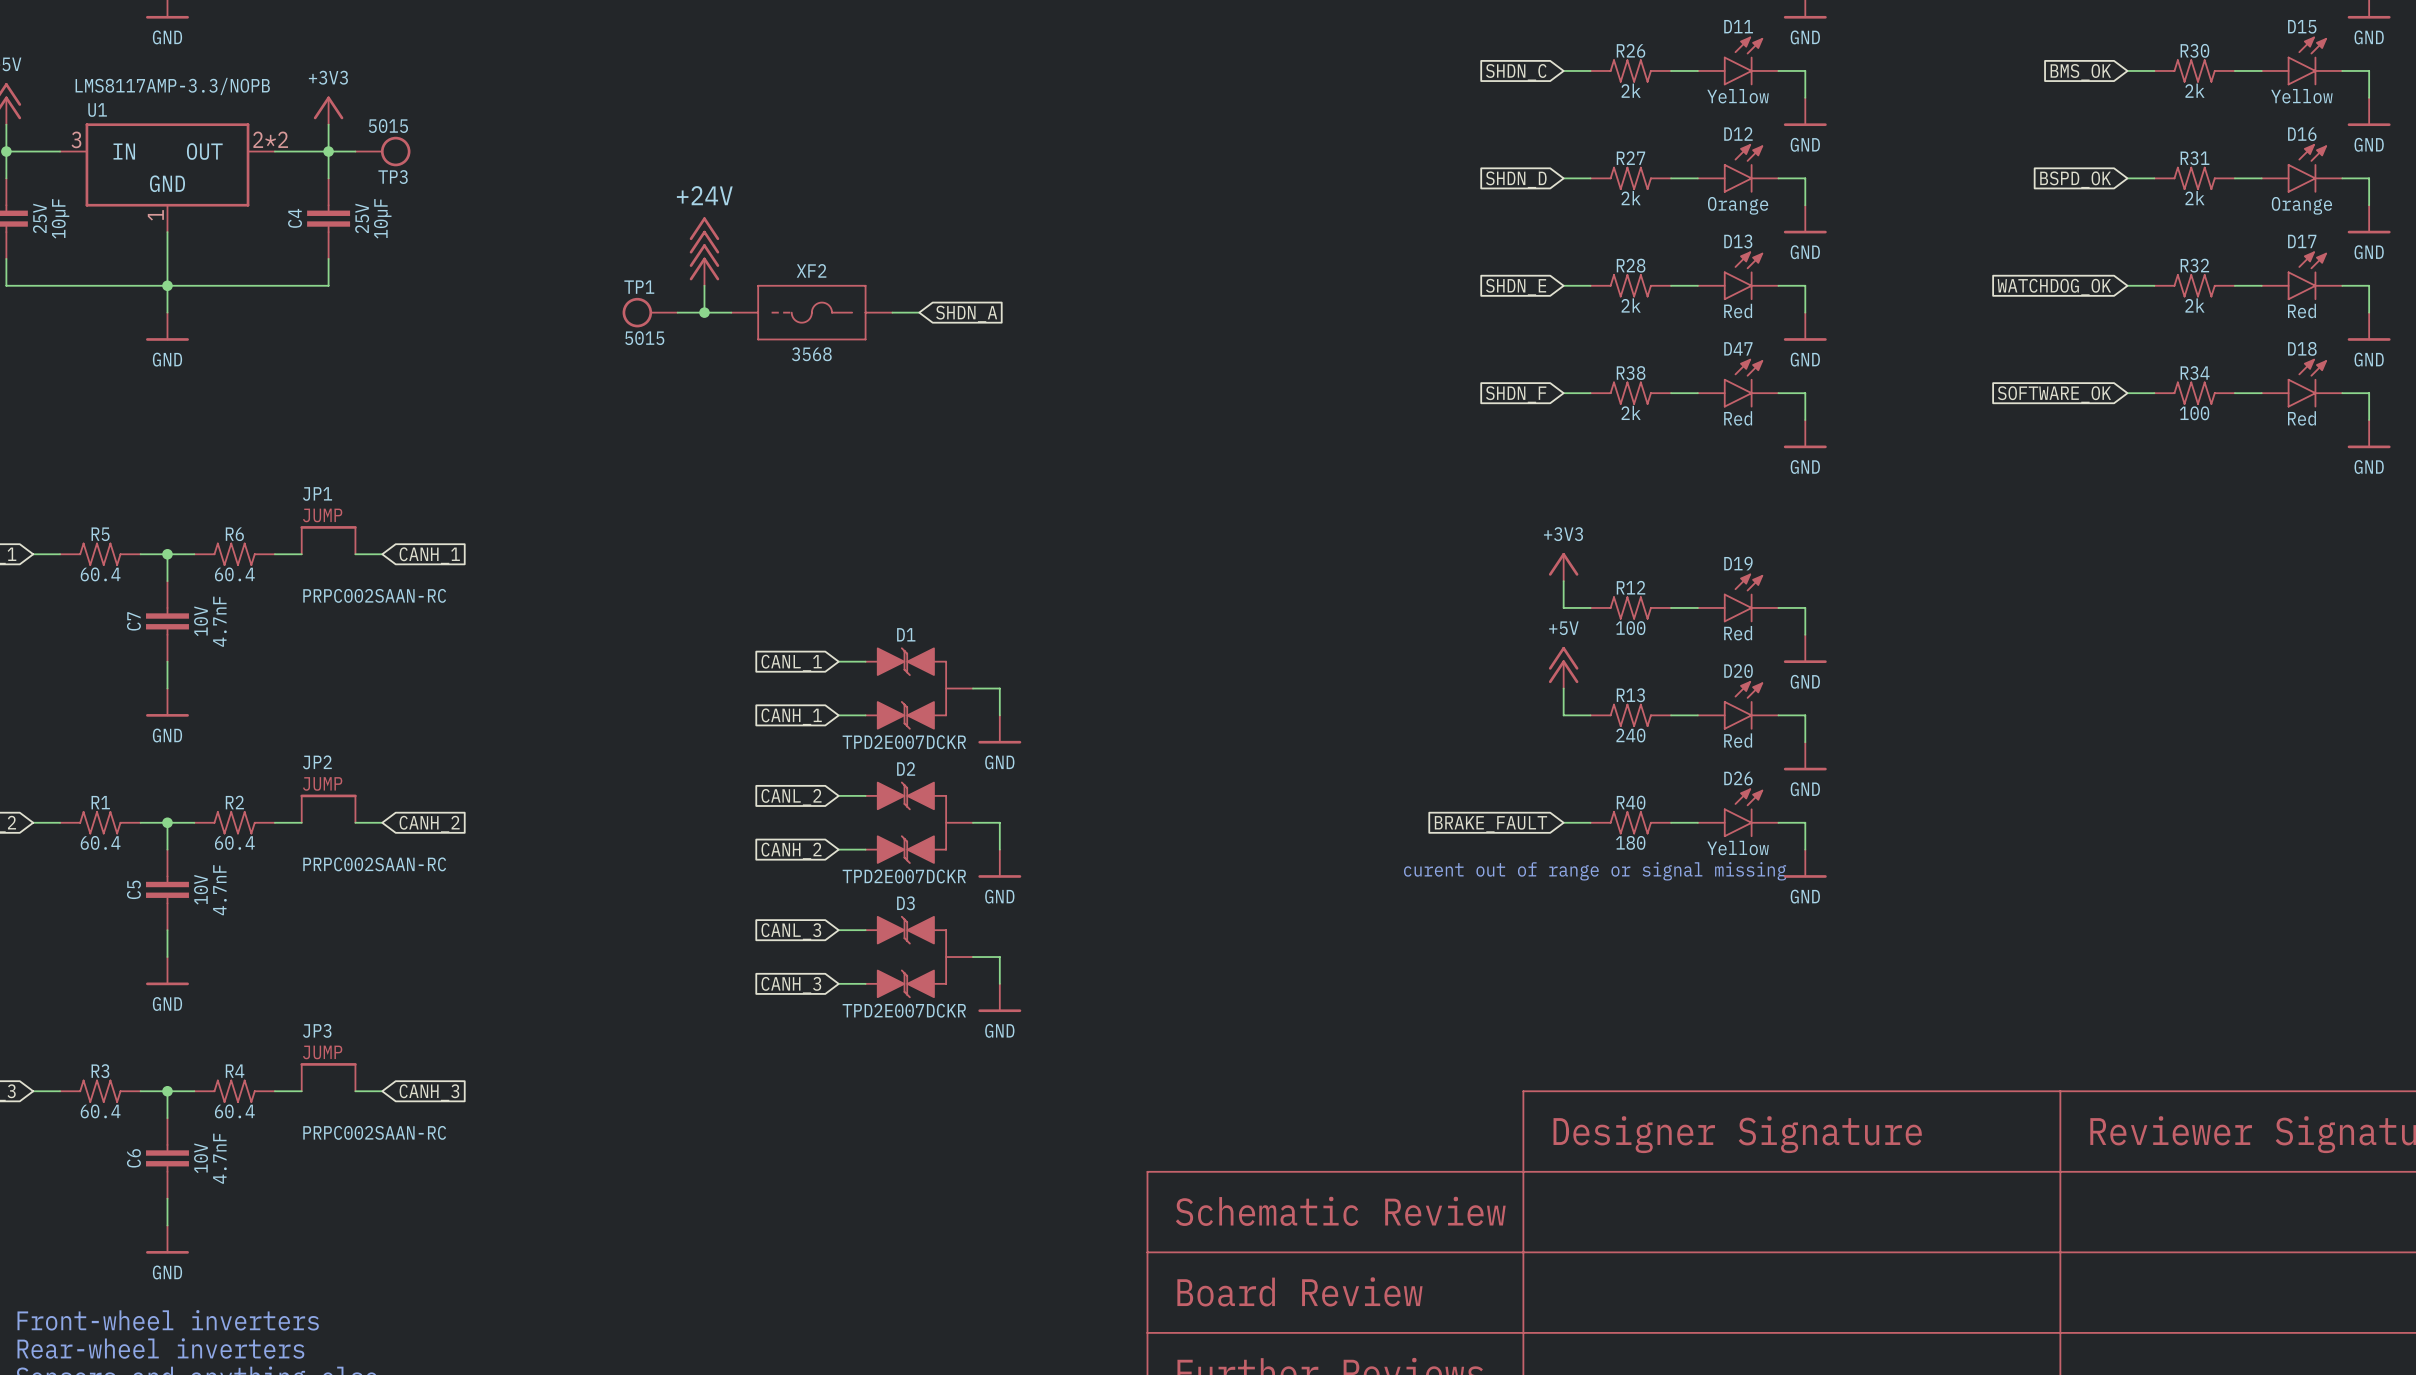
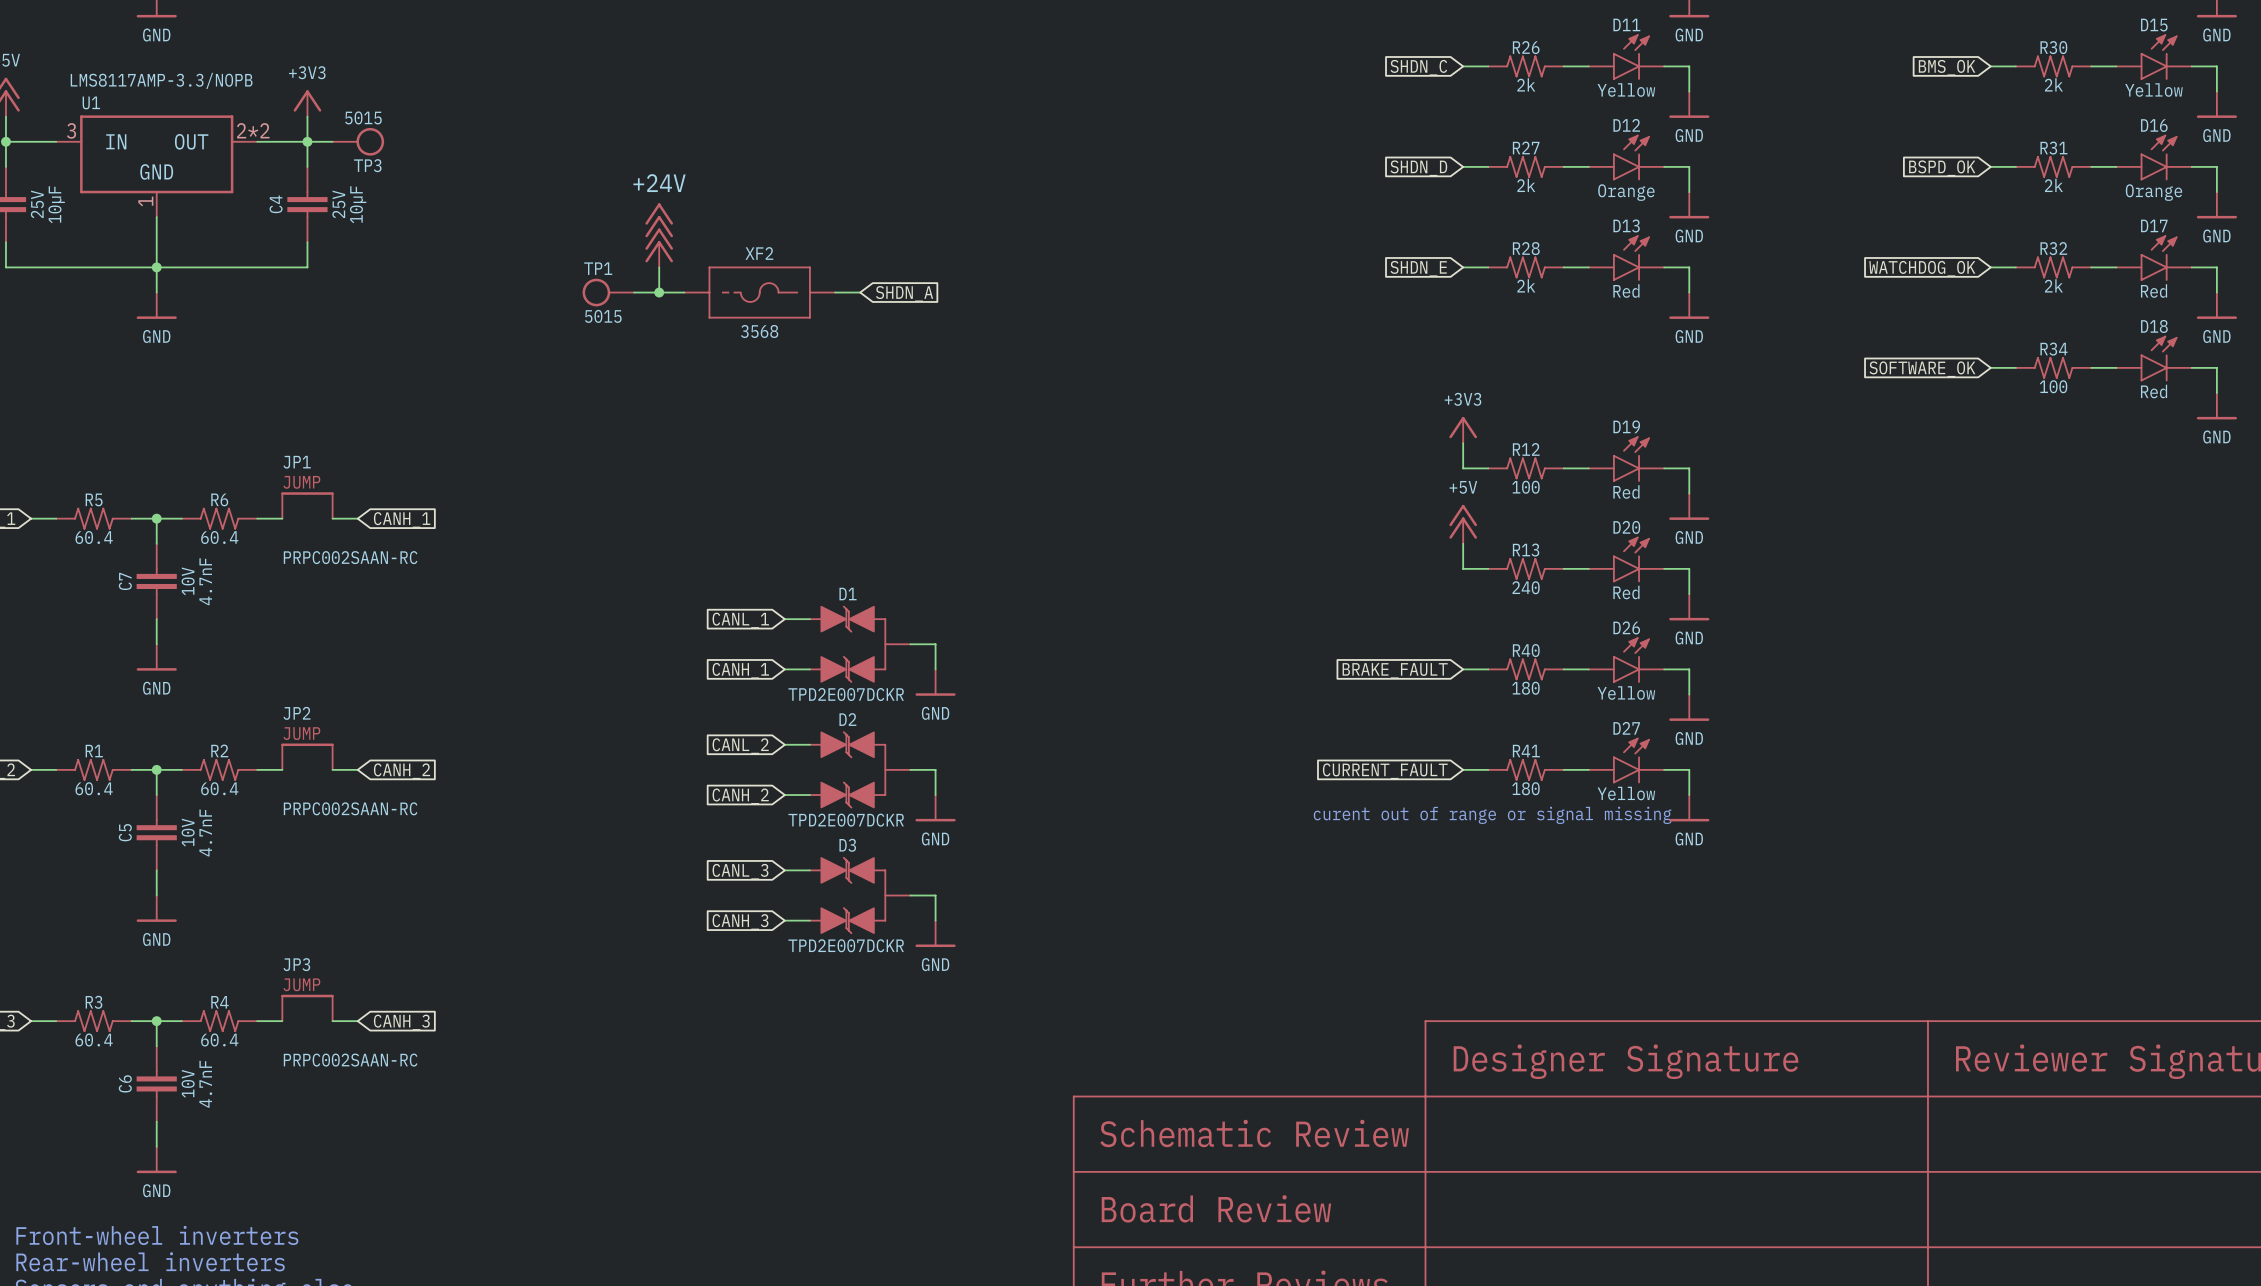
D47: (1738, 383) -> none
wire: (1563, 393) (1590, 393) -> none
R38: (1630, 393) -> none
wire: (1671, 393) (1697, 393) -> (1563, 468) (1588, 468)
wire: (1778, 393) (1805, 393) (1805, 420) -> (1664, 468) (1689, 468) (1689, 493)
global label: SHDN_F (1516, 394) -> none
power symbol position: GND (1805, 434) -> GND (1689, 506)
power symbol: none -> +3V3 (1463, 430)
wire: none -> (1463, 443) (1463, 468) (1488, 468)
D19: none -> (1626, 458)
R12: none -> (1525, 468)
D19 name: D19 (1738, 563) -> D20 (1626, 527)
power symbol: +3V3 (1563, 567) -> +5V (1463, 524)
R12 name: R12 (1631, 587) -> R13 (1526, 550)
R12 text: 100 (1630, 628) -> 240 (1526, 587)
power symbol: +5V (1563, 667) -> none
D20 name: D20 (1738, 671) -> D26 (1626, 627)
wire: (1563, 688) (1563, 715) -> none
R13 name: R13 (1630, 695) -> R40 (1526, 650)
global label: none -> BRAKE_FAULT (1395, 670)
R13 text: 240 (1630, 735) -> 180 (1525, 688)
D20 text: Red (1738, 740) -> Yellow (1626, 693)
D26 name: D26 (1738, 778) -> D27 (1626, 728)
R40 name: R40 (1631, 802) -> R41 (1526, 751)
global label: BRAKE_FAULT (1490, 824) -> CURRENT_FAULT (1385, 771)

